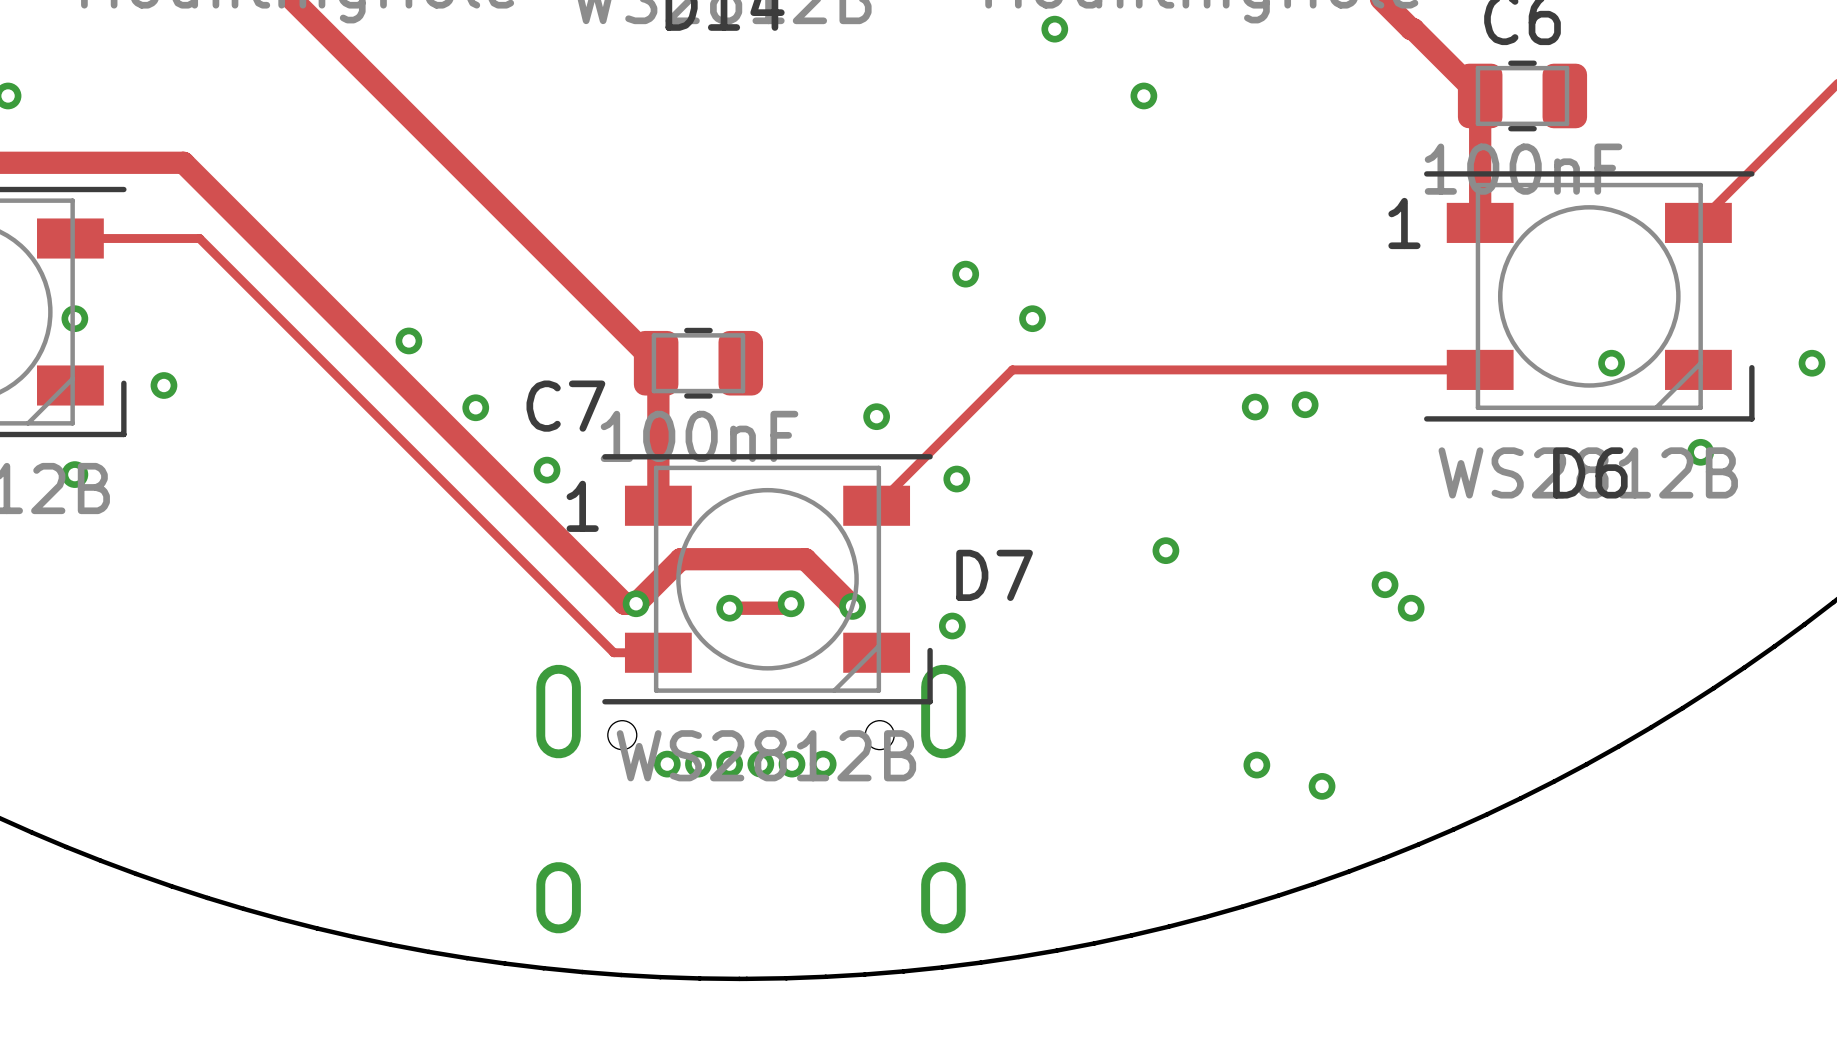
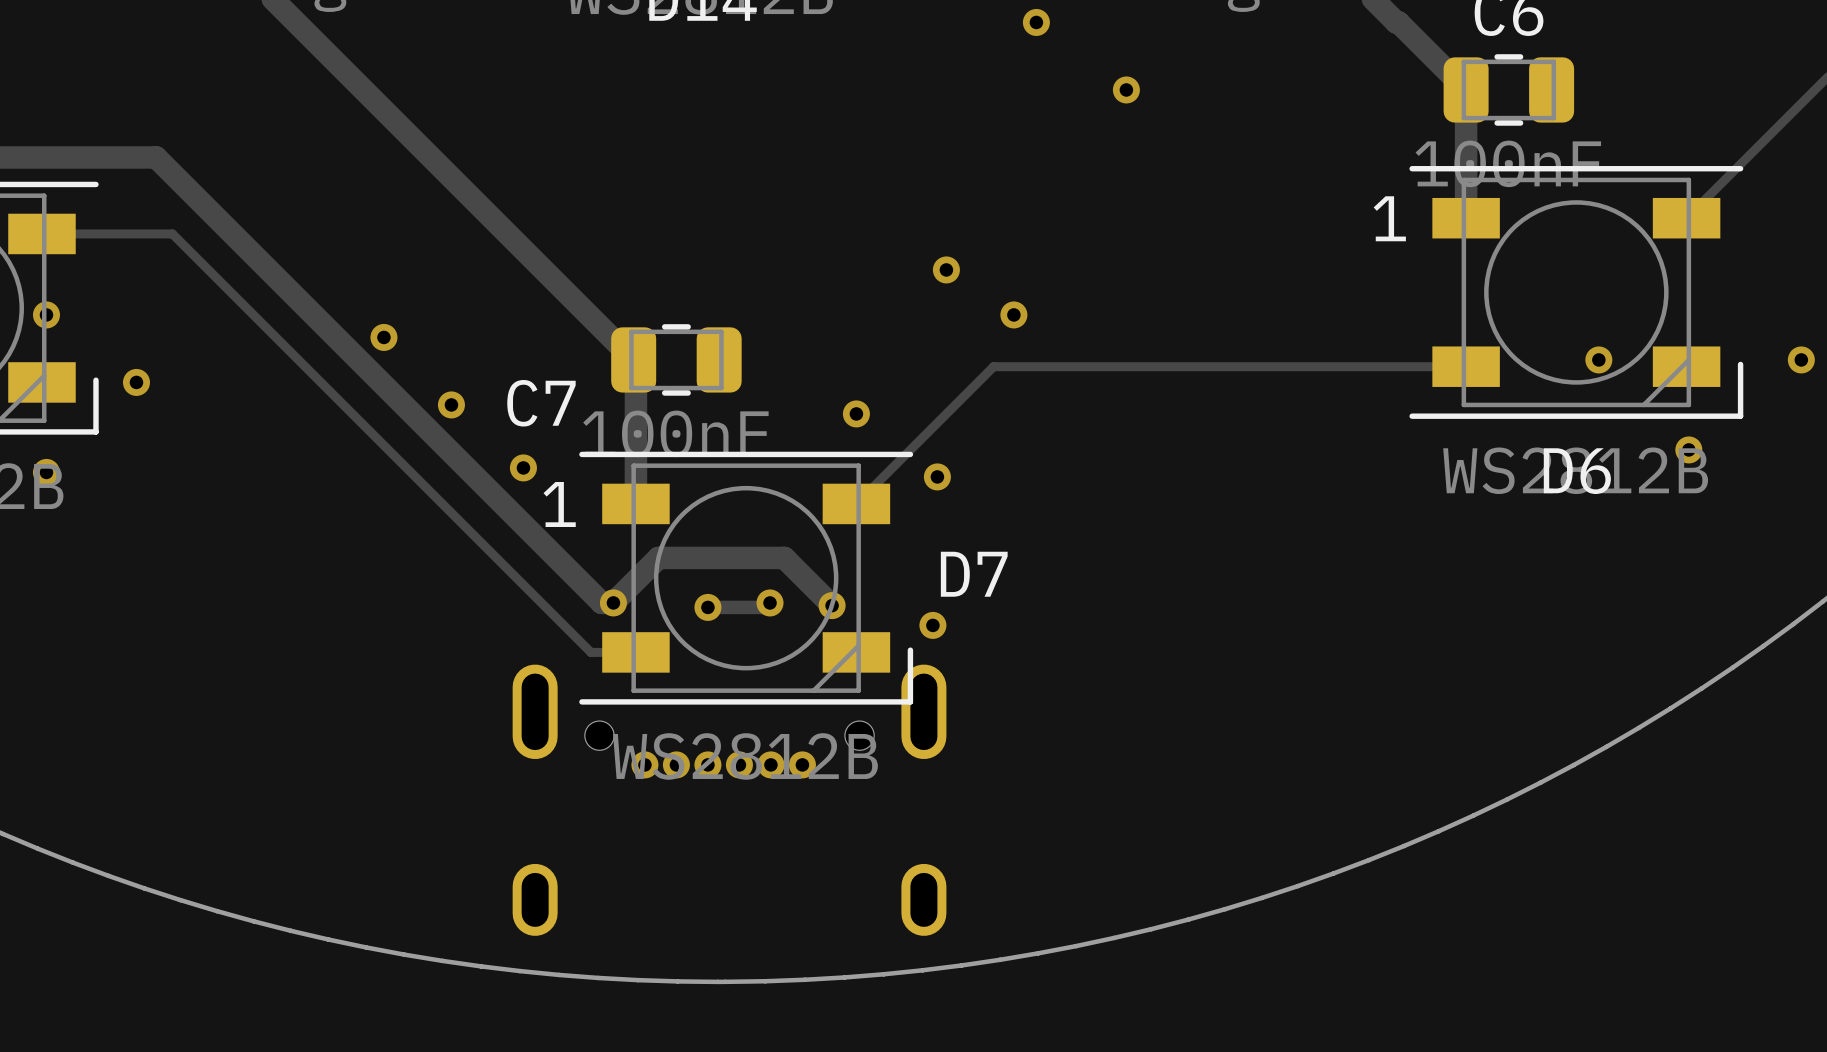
via: (1305, 404) -> none
via: (1255, 407) -> none
via: (1165, 550) -> none
via: (1385, 584) -> none
via: (1411, 608) -> none
via: (1256, 765) -> none
via: (1322, 786) -> none

